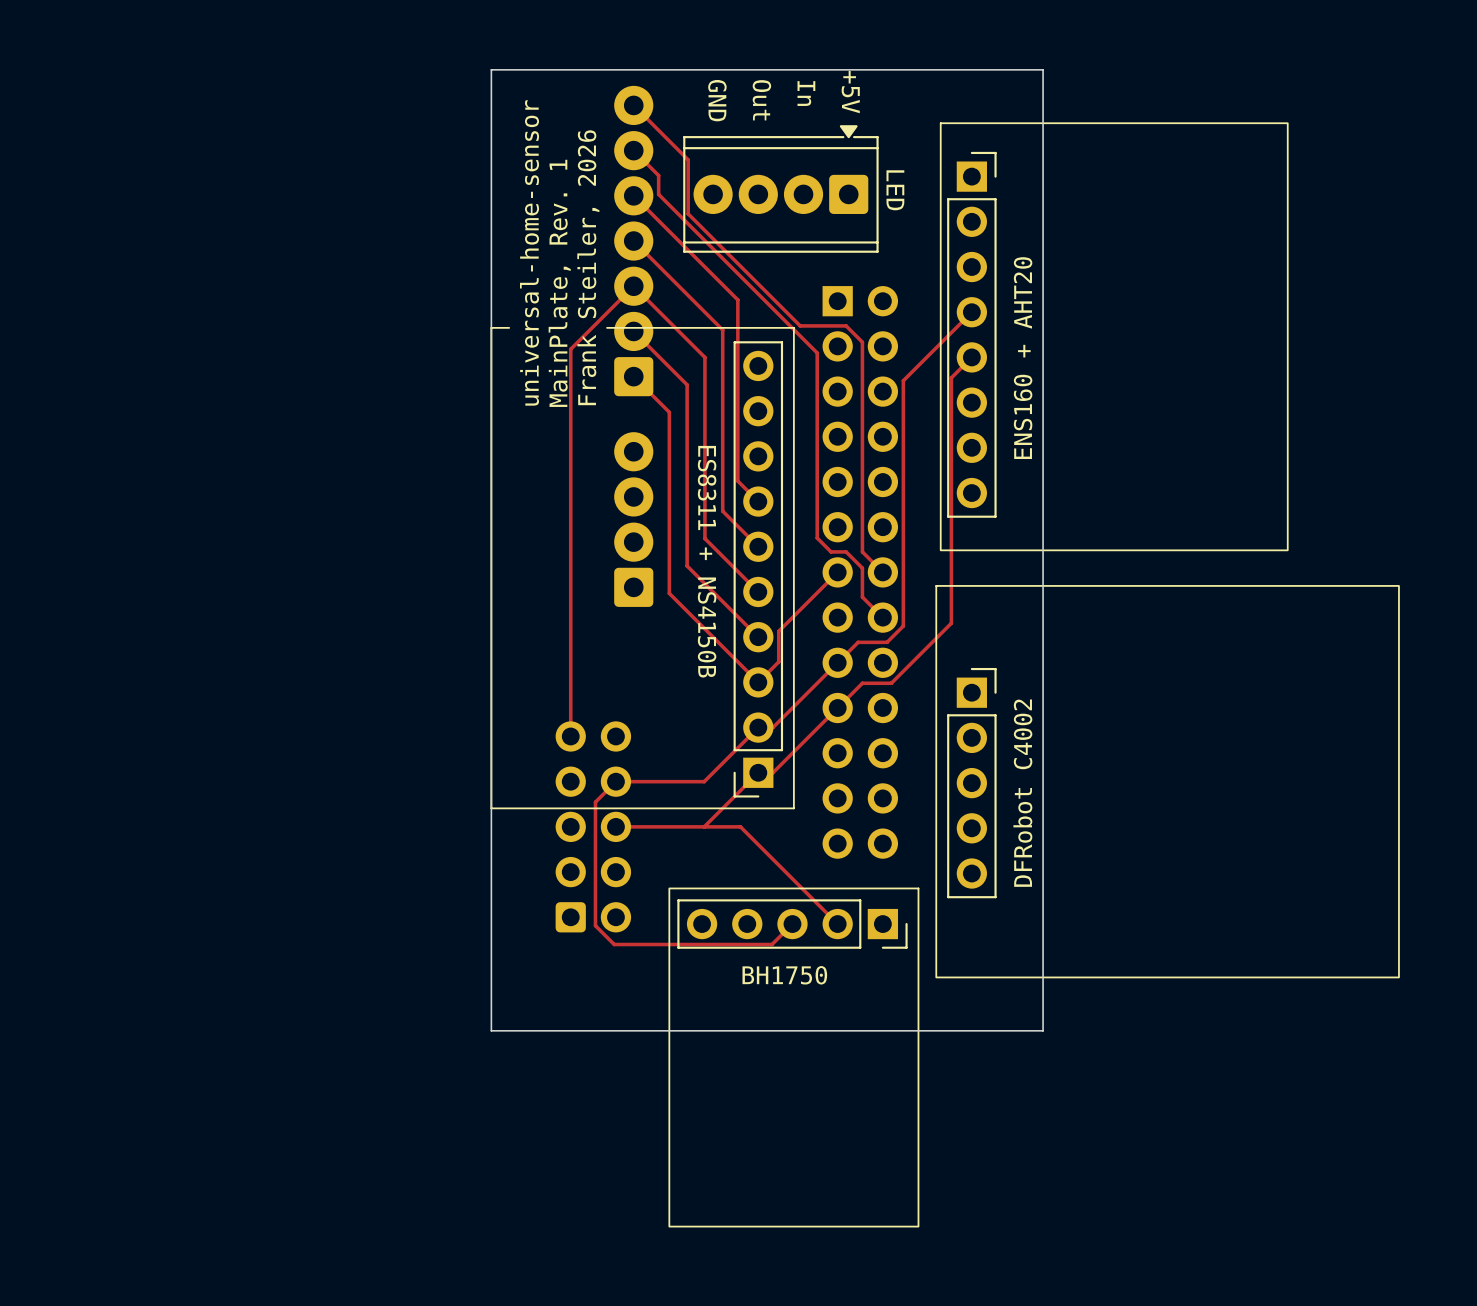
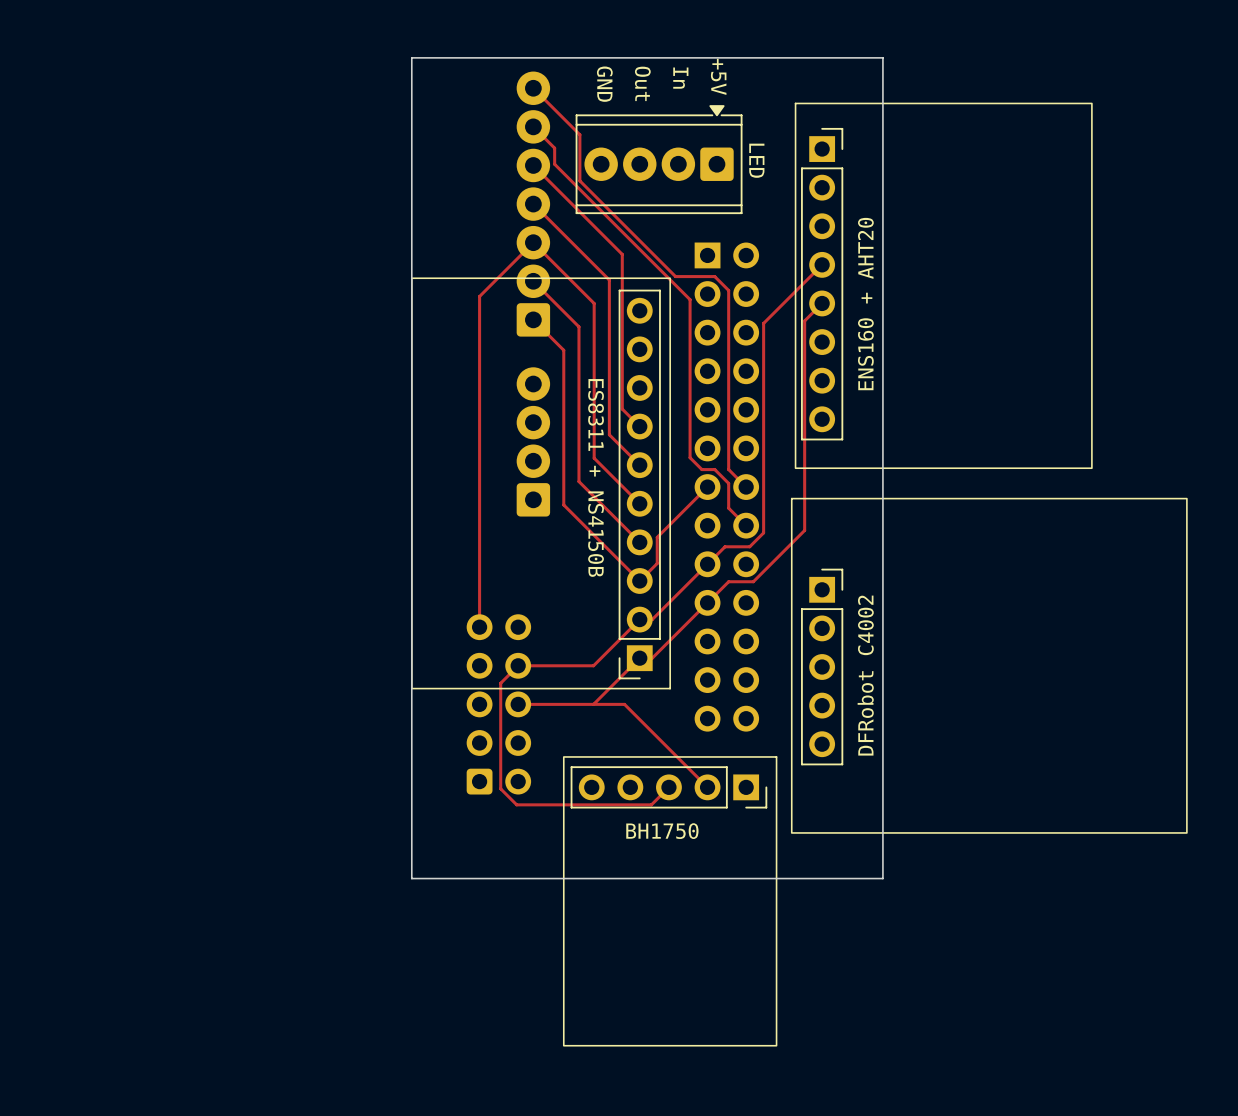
text: universal-home-sensor (529, 252) -> none
text: Frank Steiler, 2026 (588, 267) -> none
text: MainPlate, Rev. 1 (559, 283) -> none
part footprint: [490, 326, 795, 810] -> [411, 277, 671, 690]

